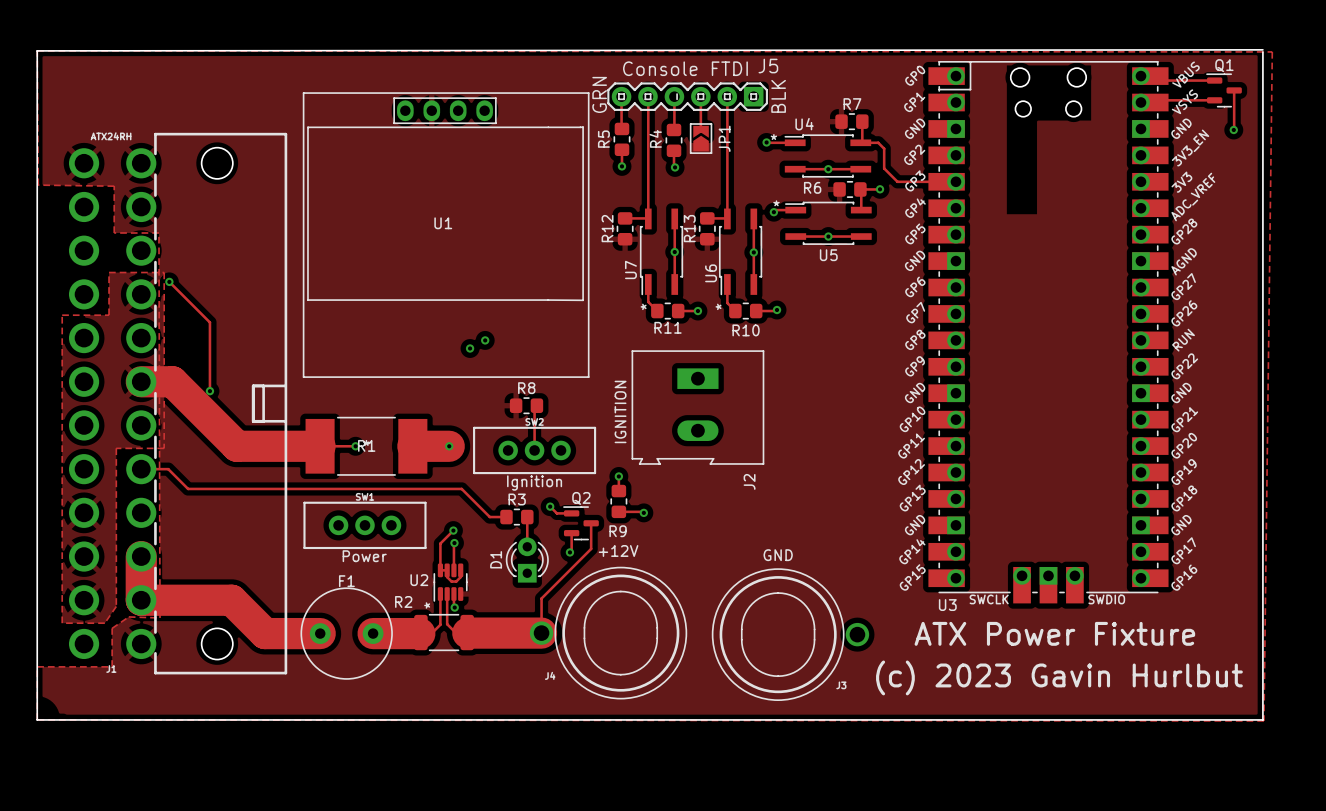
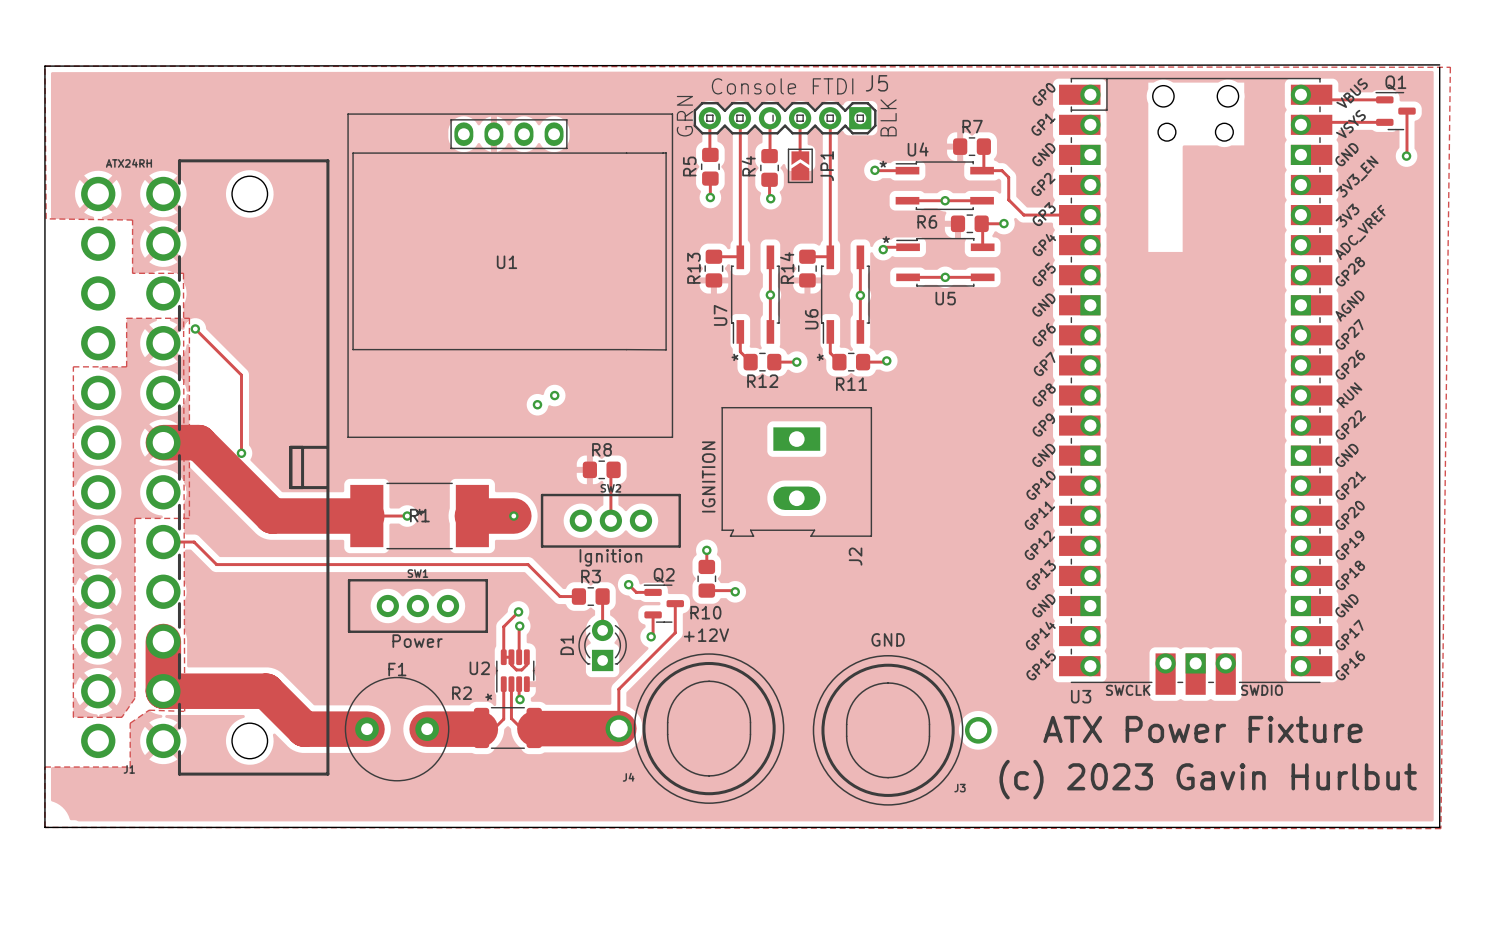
R12 name: R12 (607, 228) -> R13 (693, 268)
R13 name: R13 (689, 228) -> R14 (787, 268)
R11 name: R11 (668, 327) -> R12 (762, 381)
R10 name: R10 (746, 330) -> R11 (851, 384)
R9 name: R9 (618, 531) -> R10 (705, 612)

